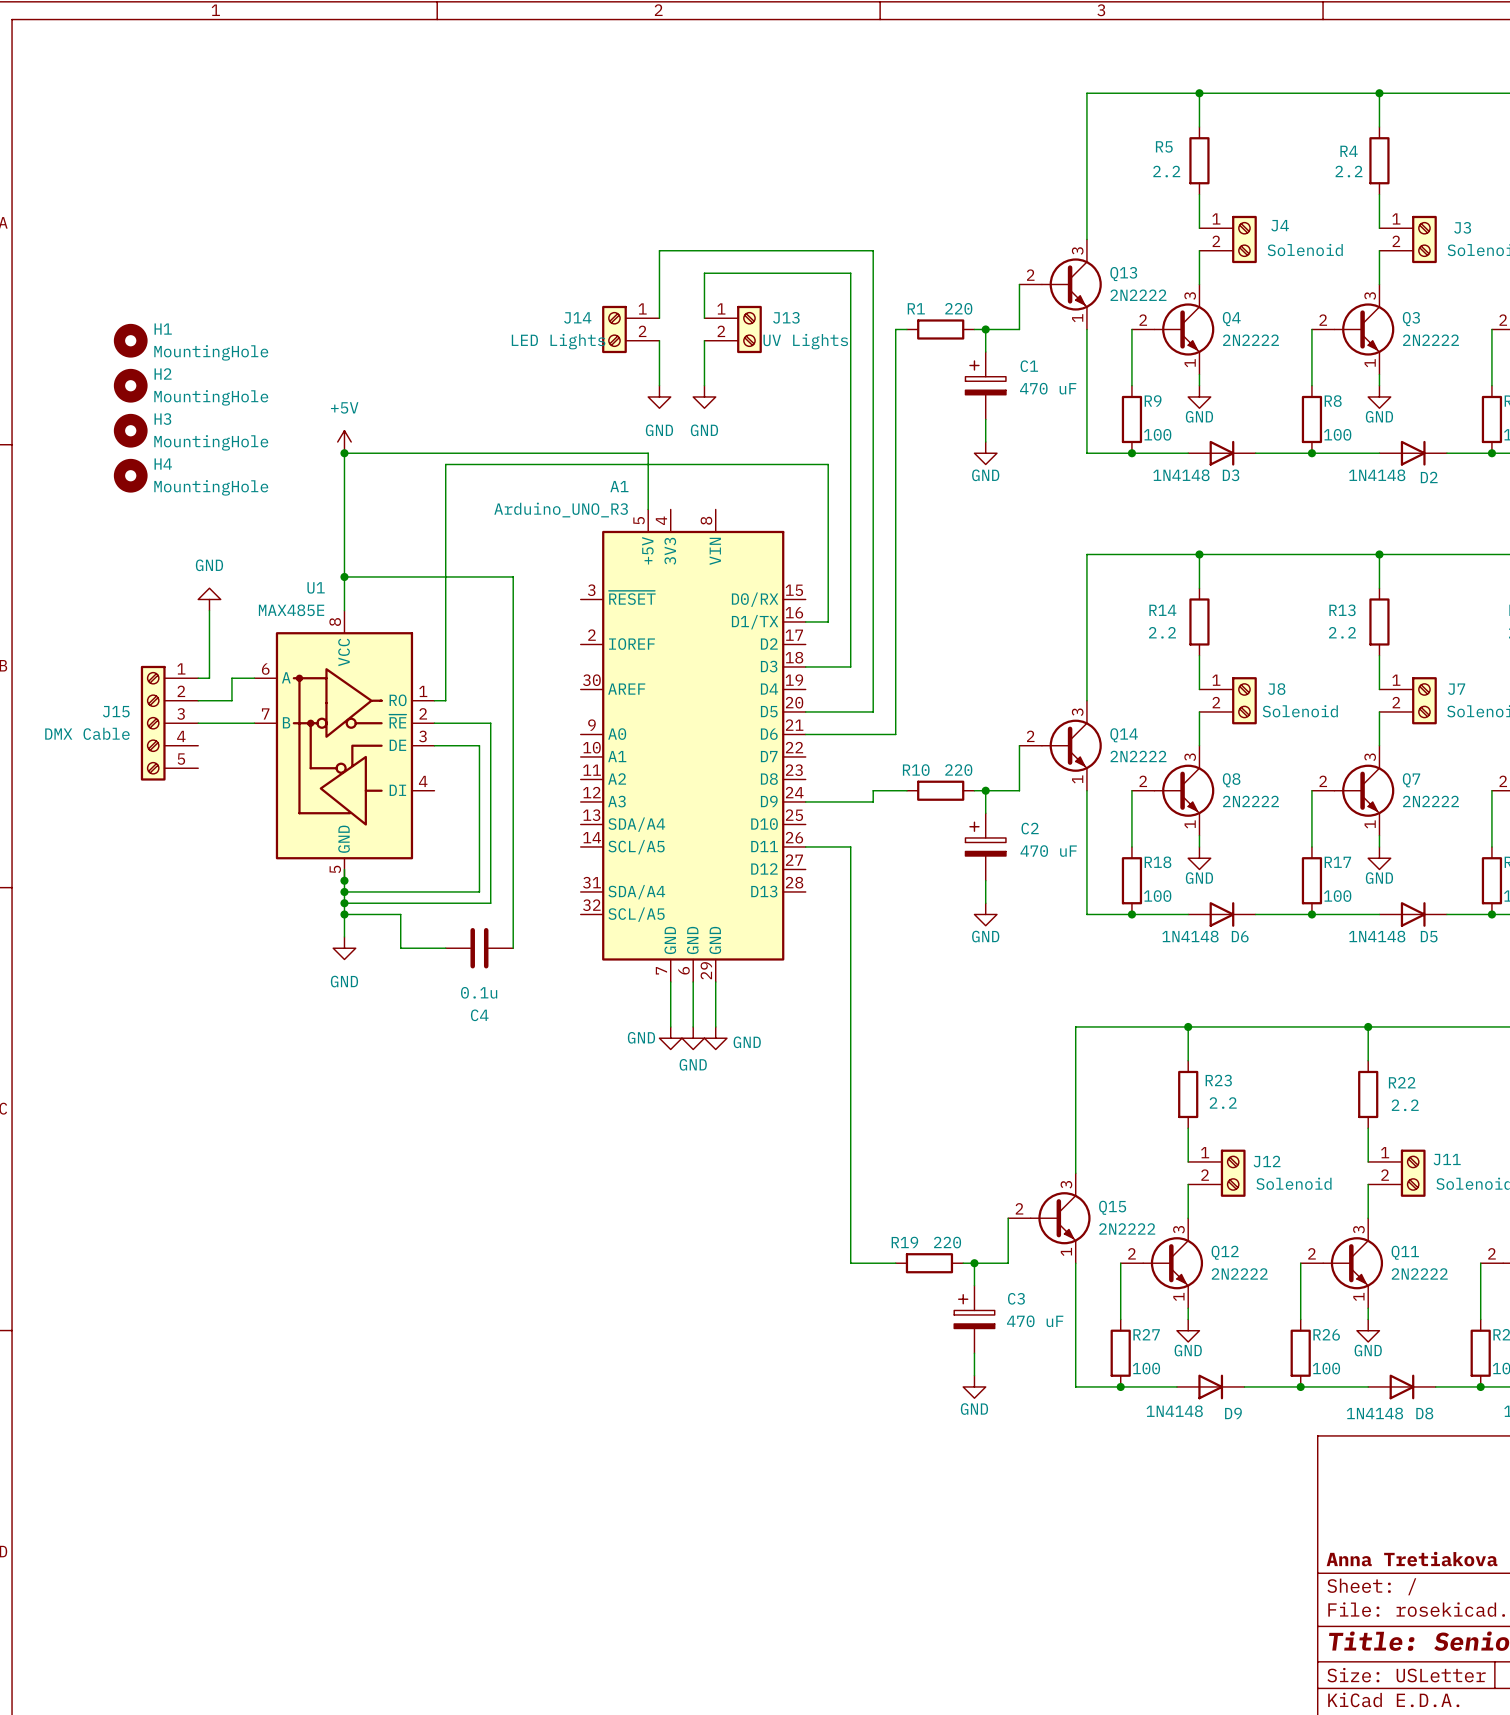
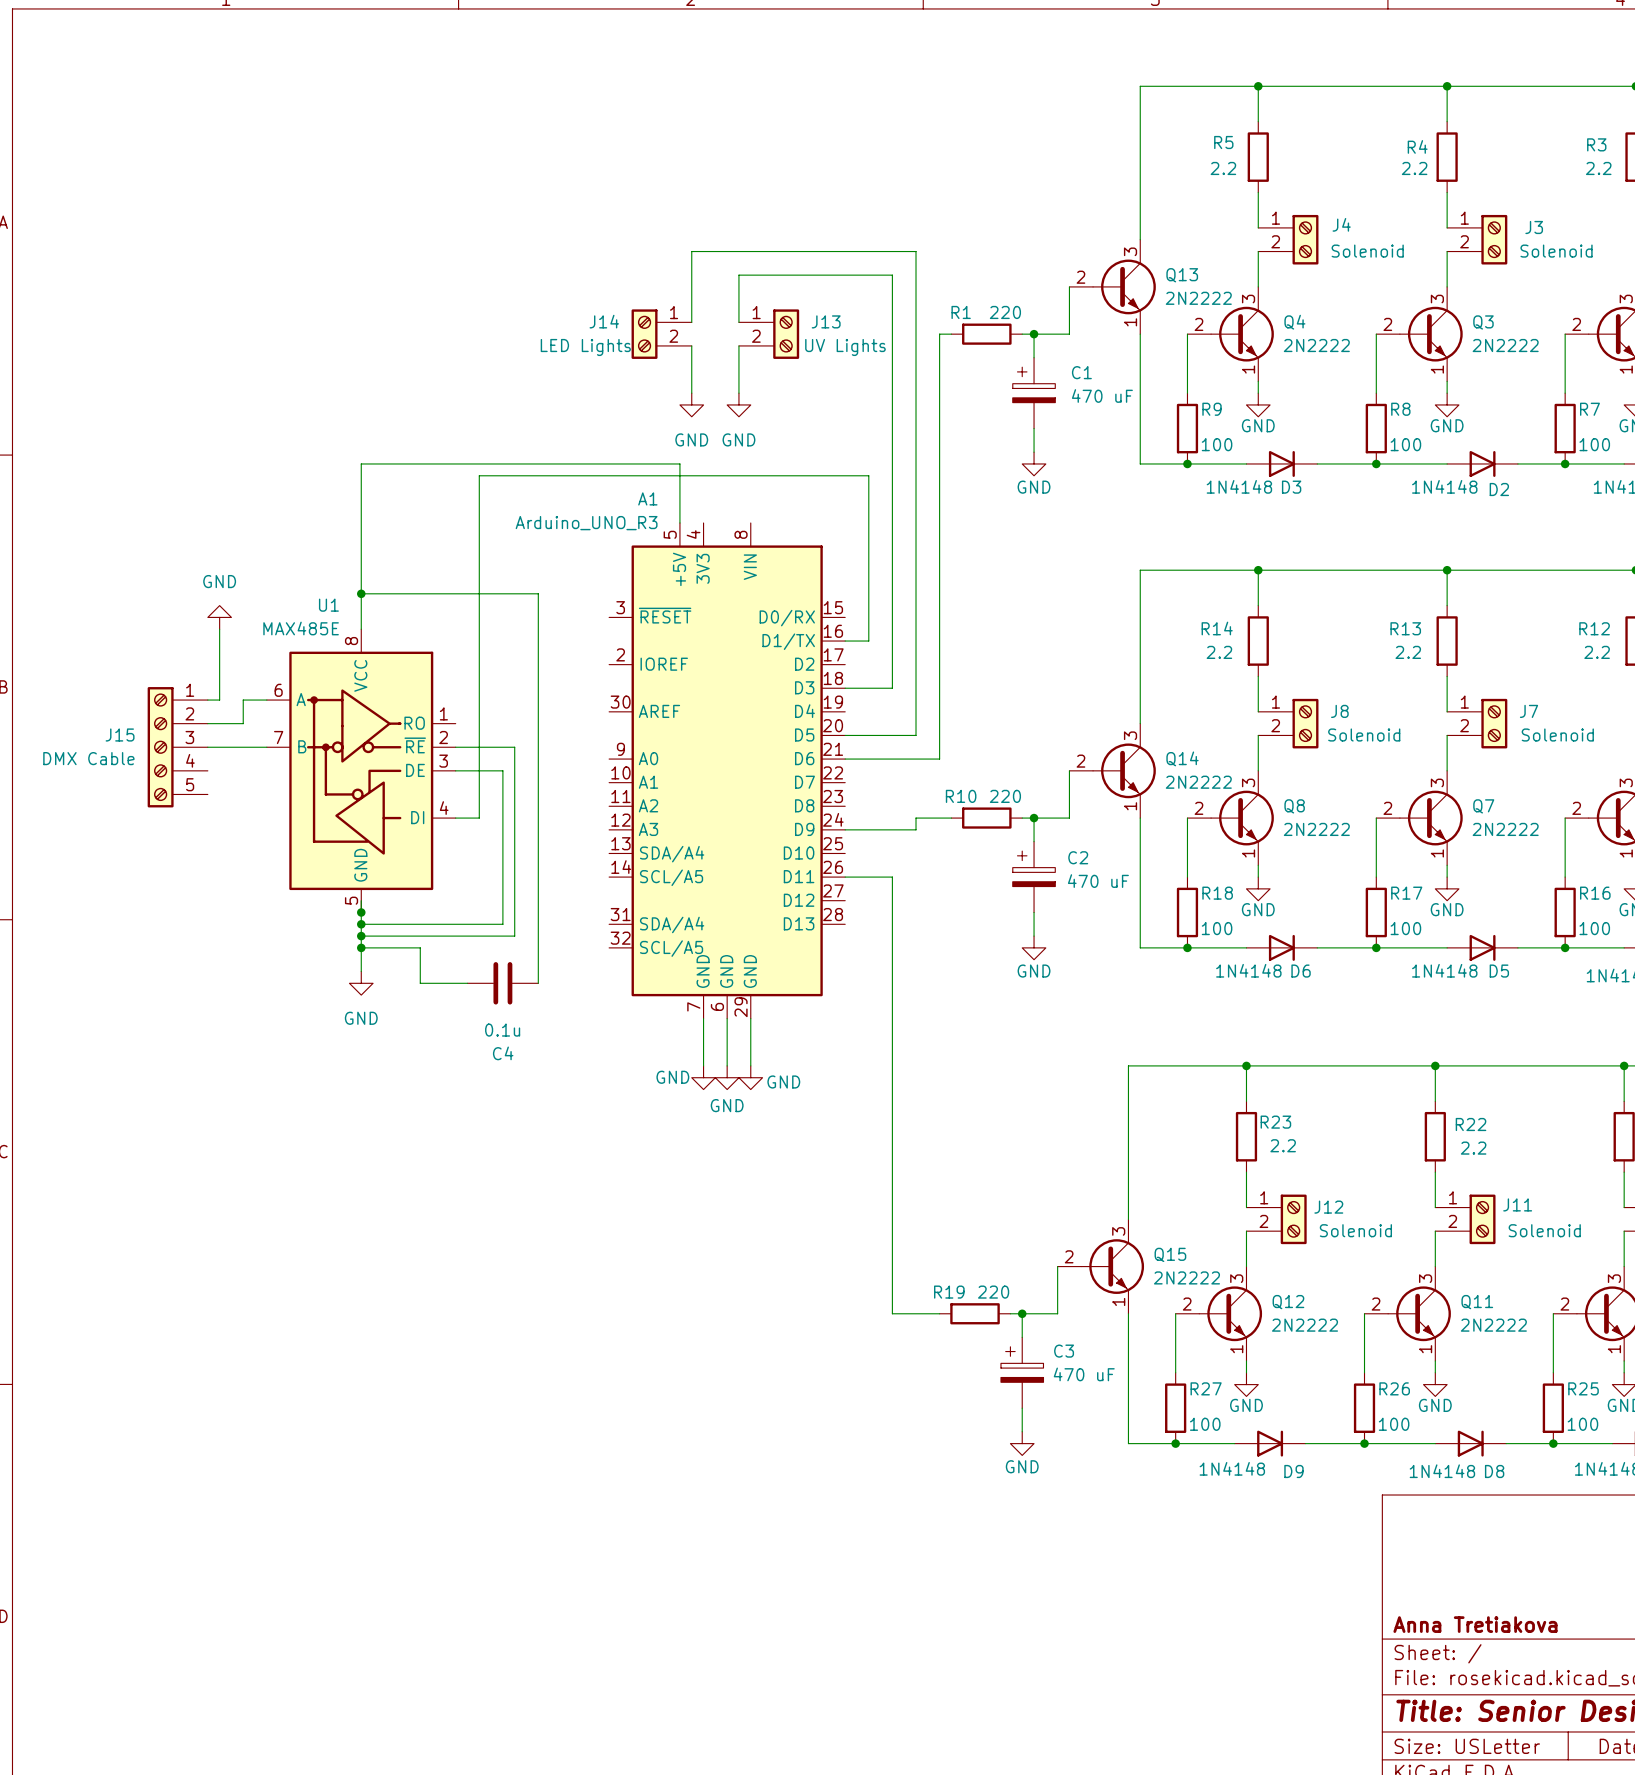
H1: MountingHole (130, 340) -> none
H2: MountingHole (130, 385) -> none
H3: MountingHole (130, 430) -> none
power symbol: +5V (344, 441) -> none
junction: (344, 453) -> none
wire: (456, 464) (445, 464) (445, 700) (434, 700) -> (479, 475) (479, 818) (455, 818)
H4: MountingHole (130, 475) -> none

